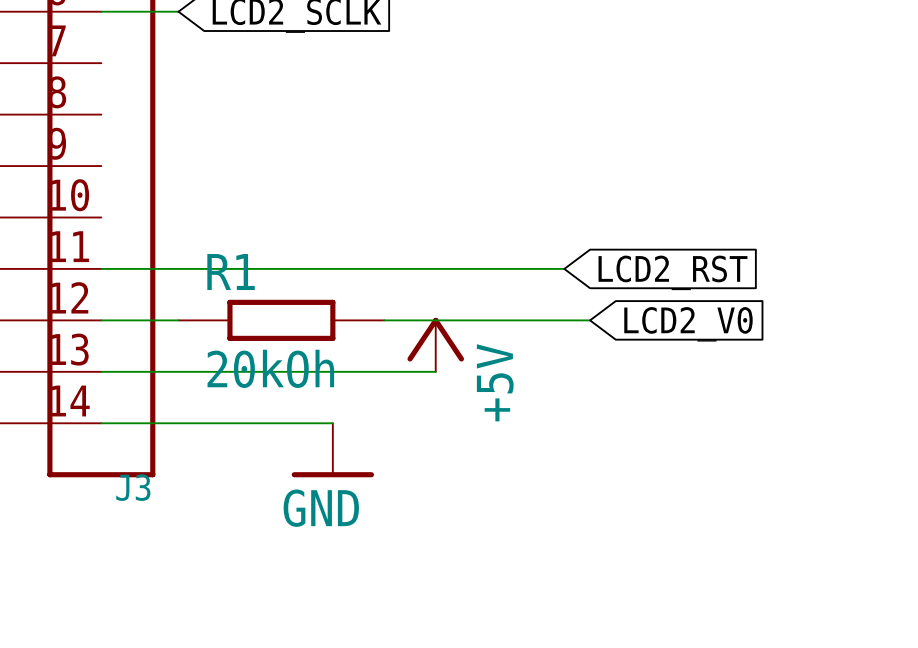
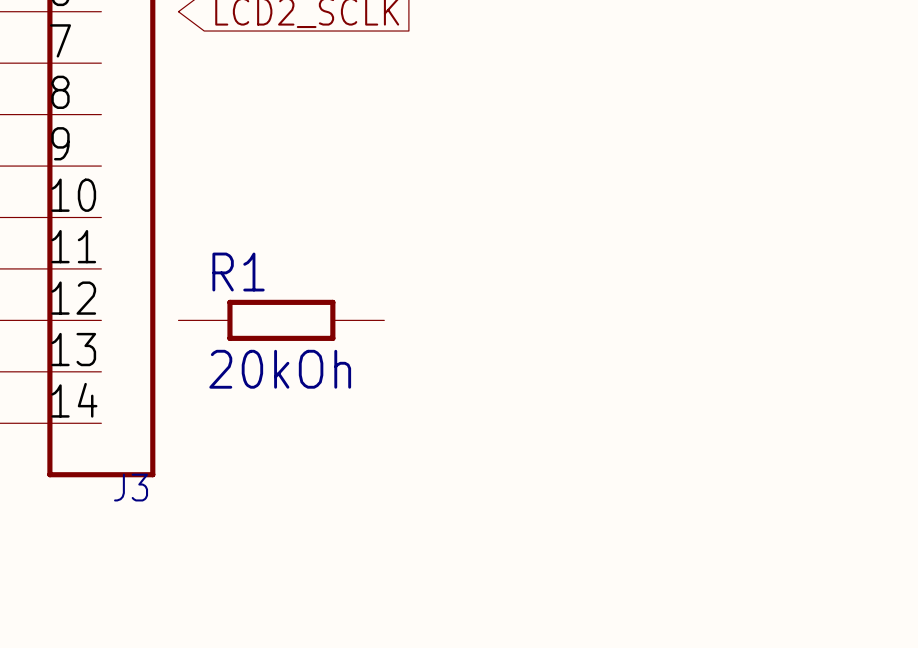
wire: (101, 11) (178, 11) -> none
wire: (101, 268) (564, 268) -> none
global label: LCD2_RST (672, 272) -> none
wire: (101, 320) (178, 320) -> none
wire: (384, 320) (590, 320) -> none
global label: LCD2_V0 (688, 324) -> none
power symbol: +5V (435, 344) -> none
wire: (101, 371) (435, 371) -> none
wire: (101, 423) (332, 423) -> none
power symbol: GND (332, 450) -> none

